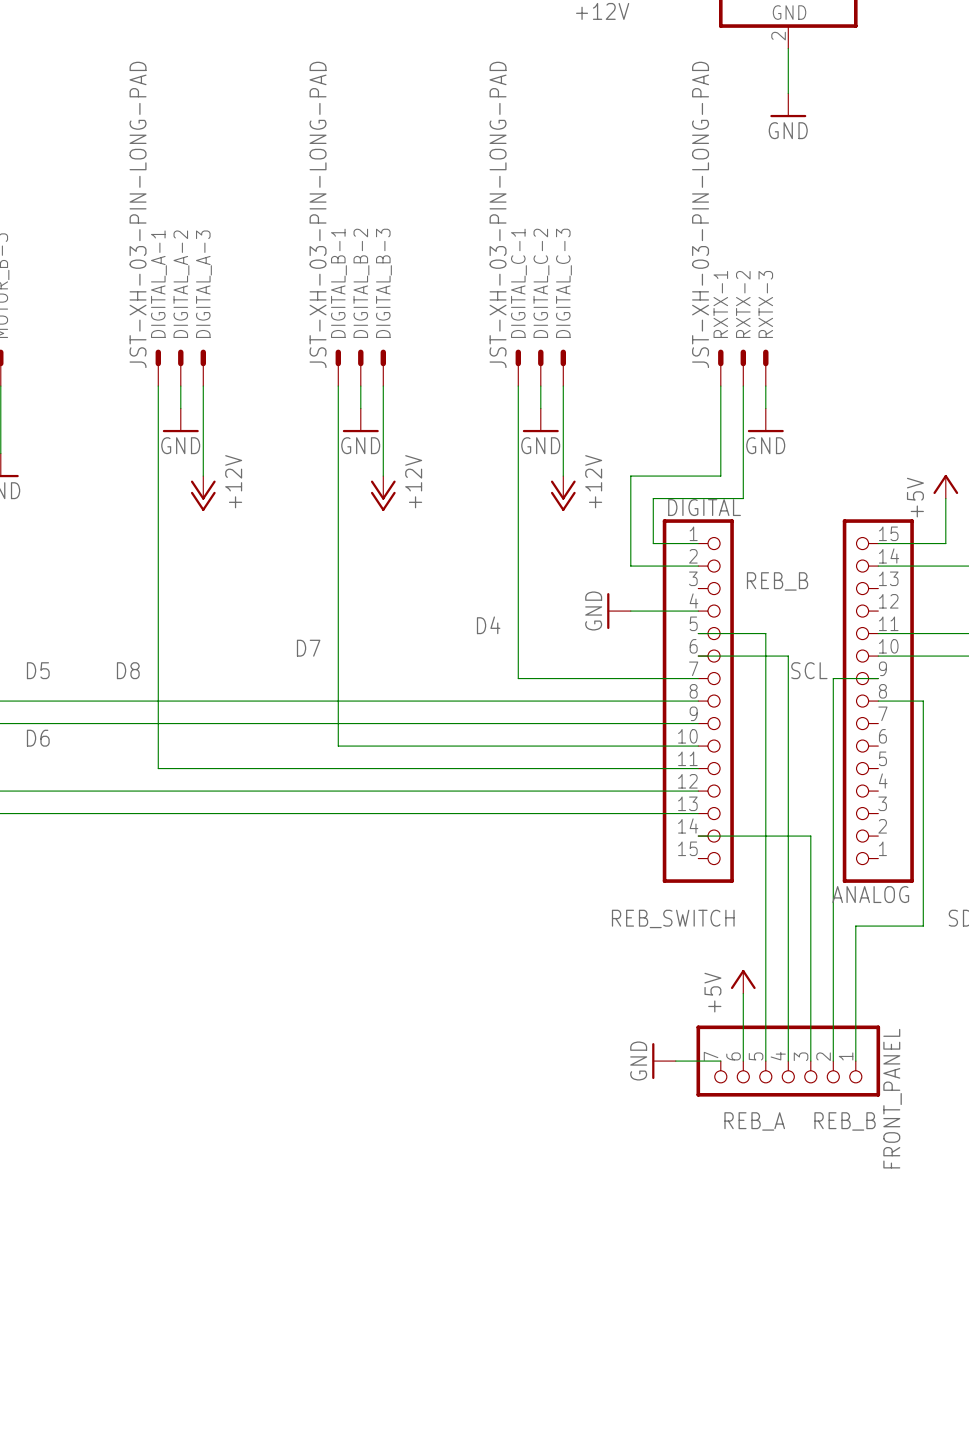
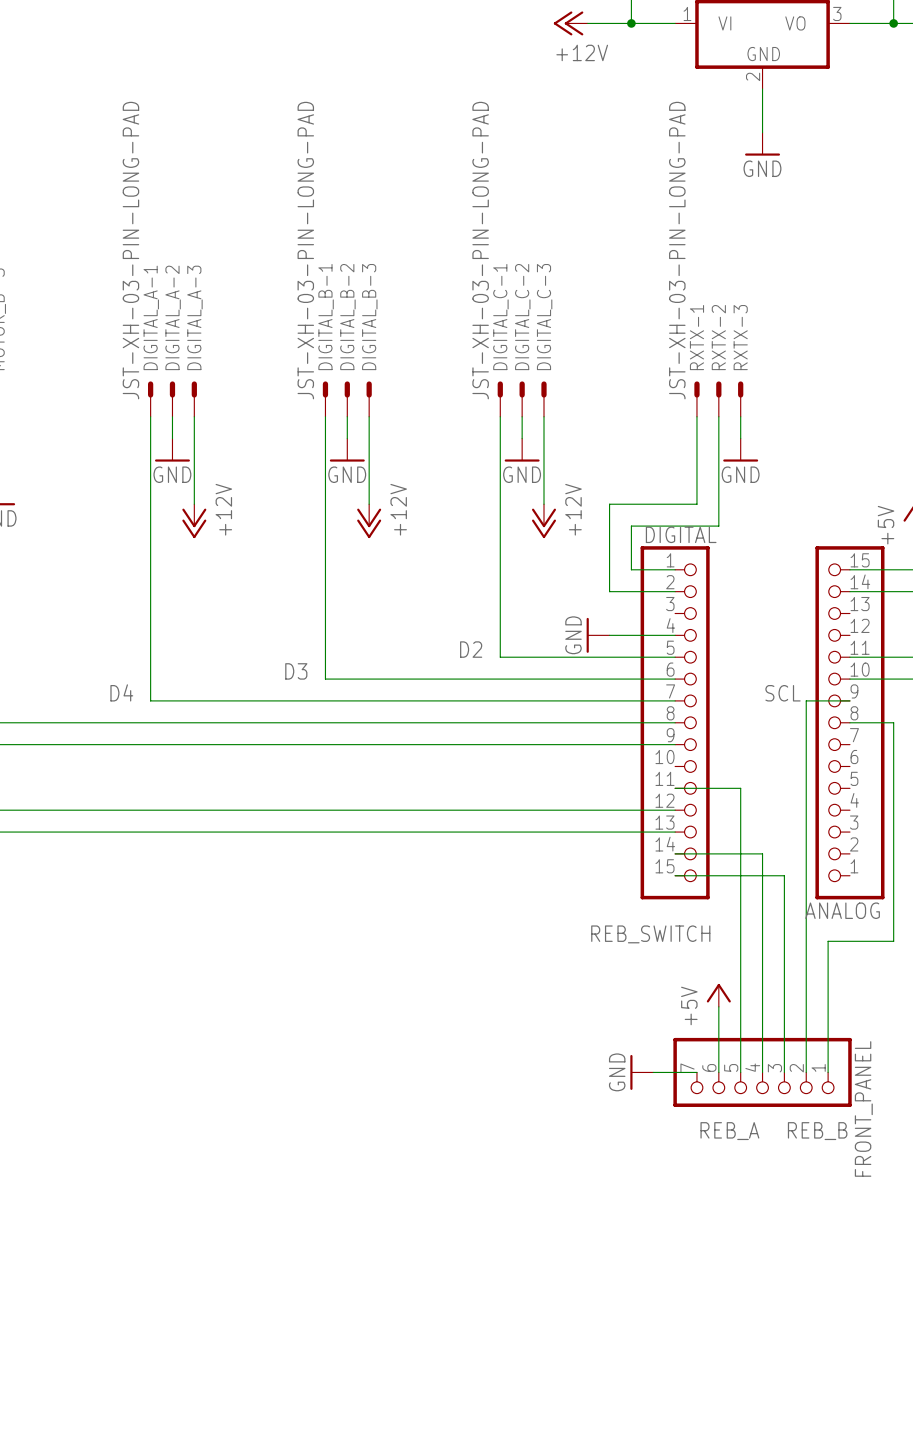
label: REB_B (777, 581) -> none
label: D4 (488, 625) -> D2 (471, 649)
wire: (518, 633) (518, 678) -> (500, 657) (675, 657)
wire: (698, 633) (765, 633) (765, 768) -> (675, 788) (740, 788)
label: D7 (308, 648) -> D3 (296, 671)
wire: (338, 656) (338, 746) (698, 746) -> (325, 679) (675, 679)
wire: (698, 656) (788, 656) (788, 836) (810, 836) (810, 858) -> (675, 875) (784, 875)
label: D5 (38, 670) -> none
label: D8 (128, 670) -> D4 (121, 692)
wire: (158, 678) (158, 768) (698, 768) -> (150, 700) (500, 700)
label: D6 (38, 738) -> none

